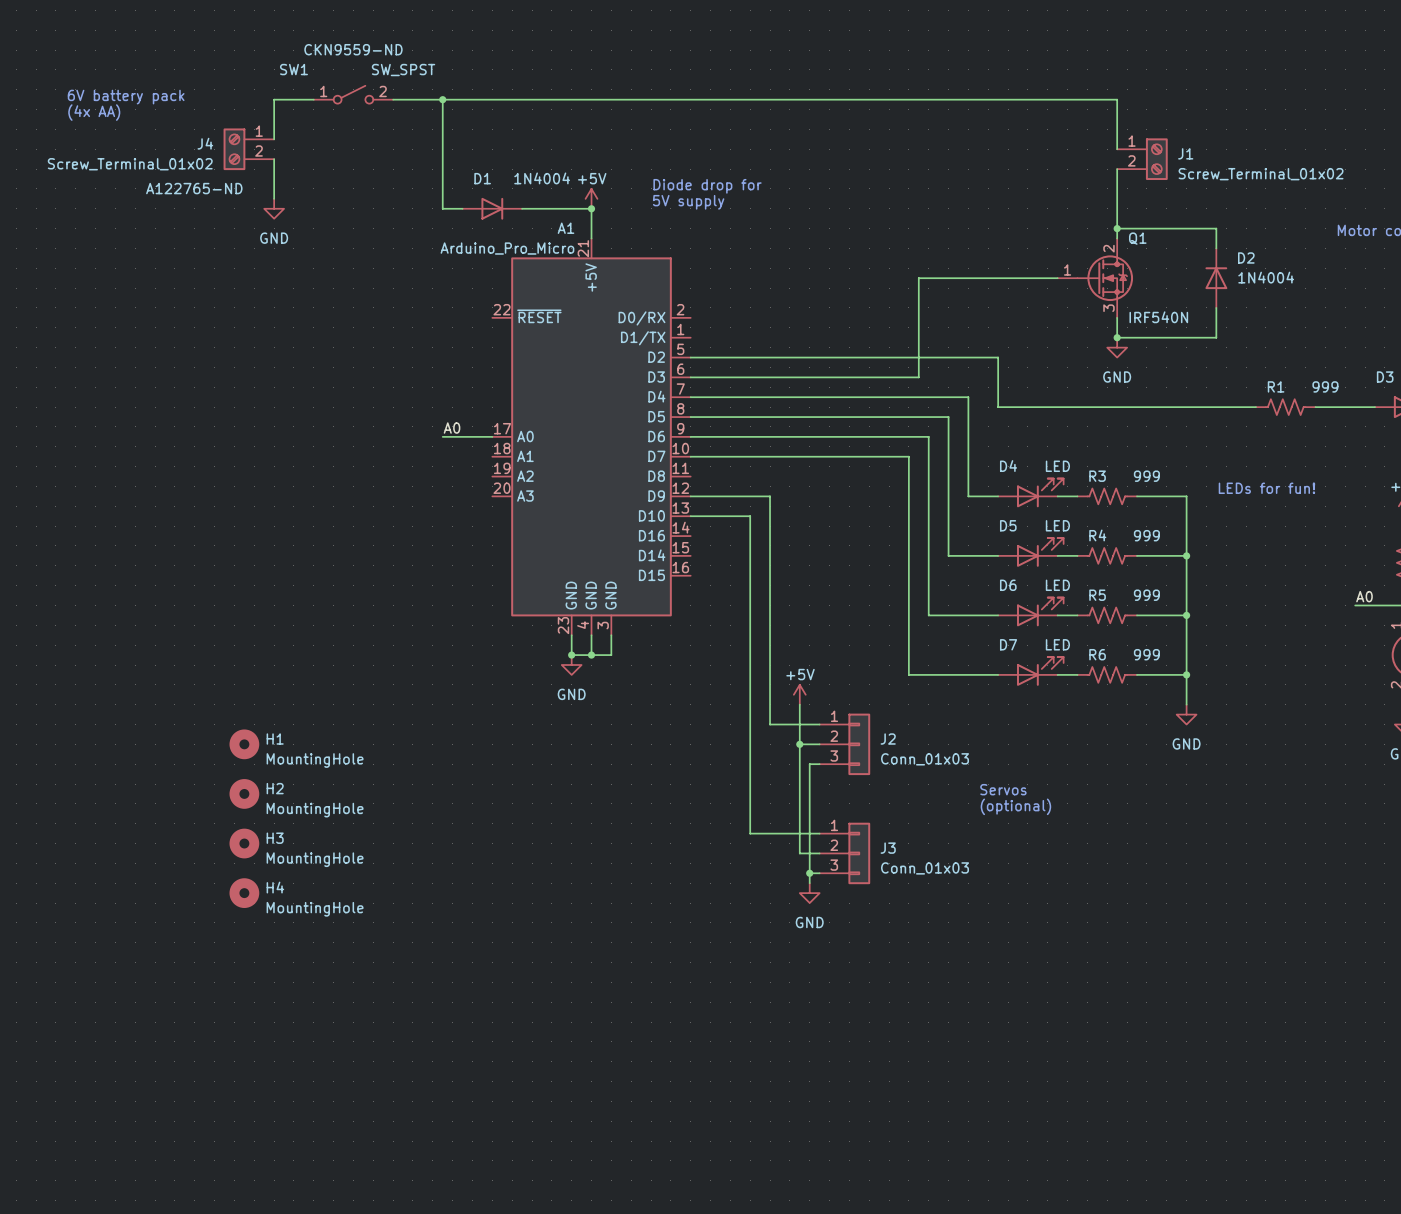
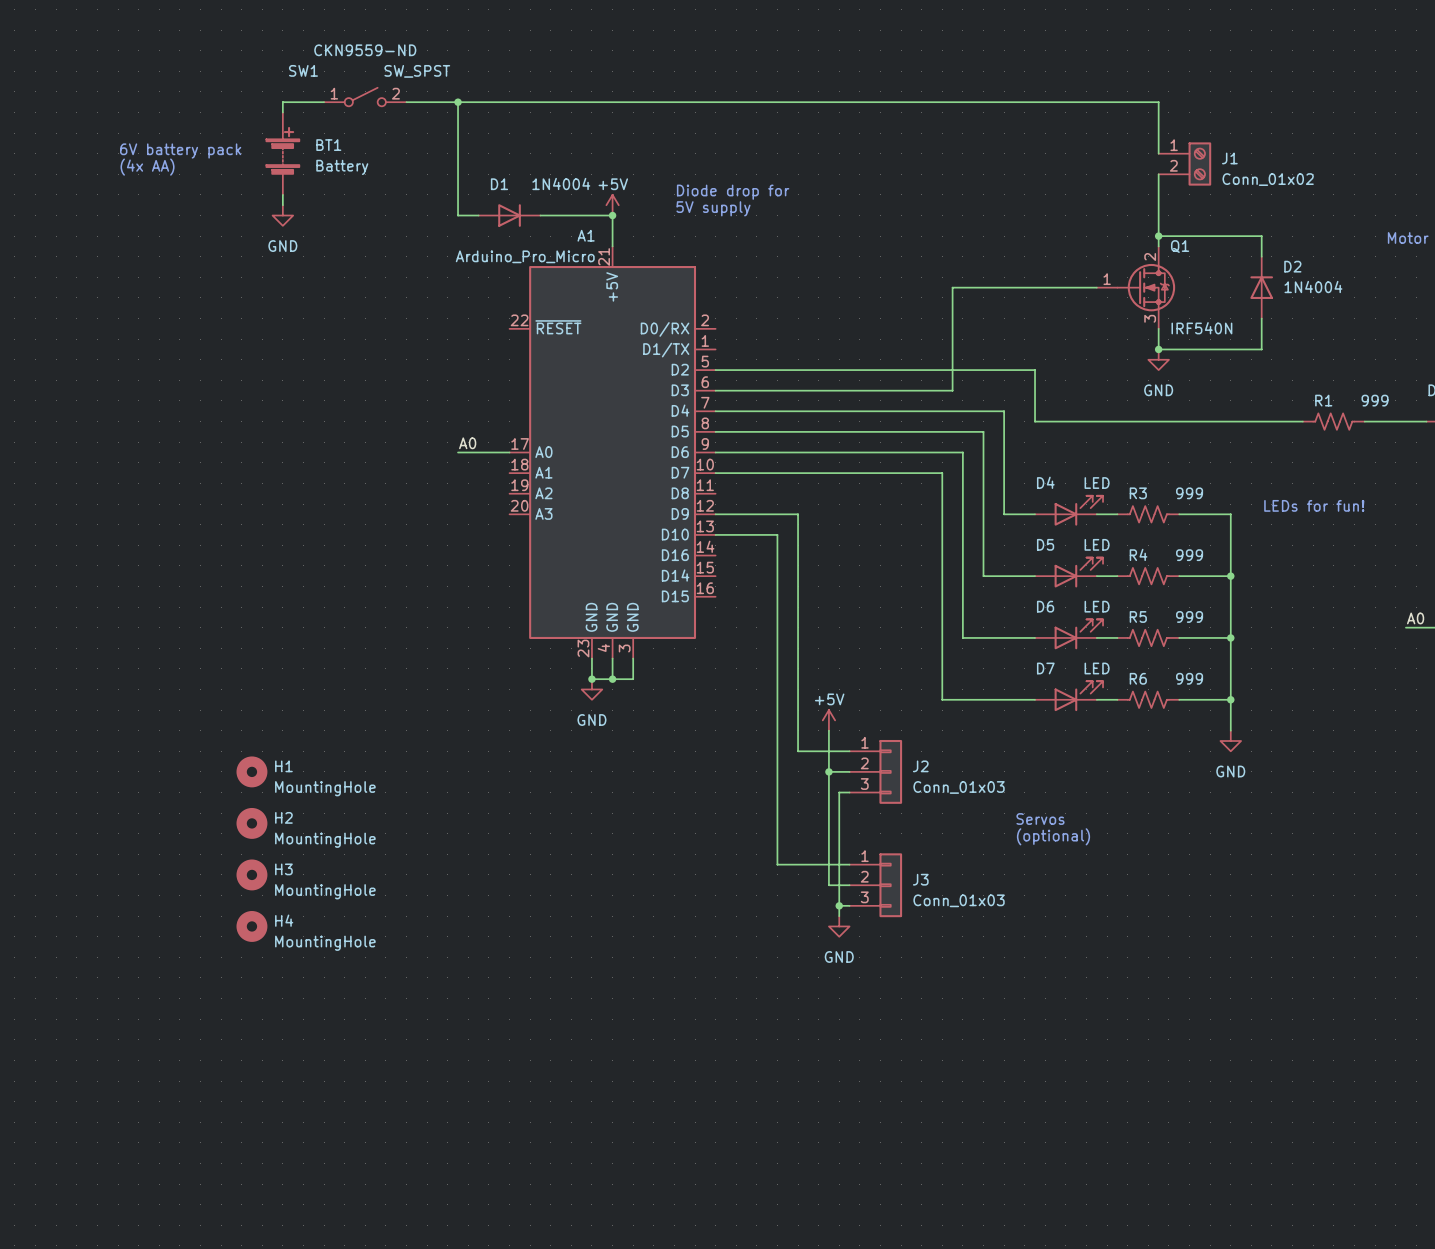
text position: 6V battery pack (126, 97) -> 6V battery pack (180, 150)
text position: (4x AA) (94, 112) -> (4x AA) (147, 167)
J4: Screw_Terminal_01x02 (248, 149) -> none
BT1: none -> Battery (282, 153)
J1 value: Screw_Terminal_01x02 (1261, 174) -> Conn_01x02 (1268, 179)

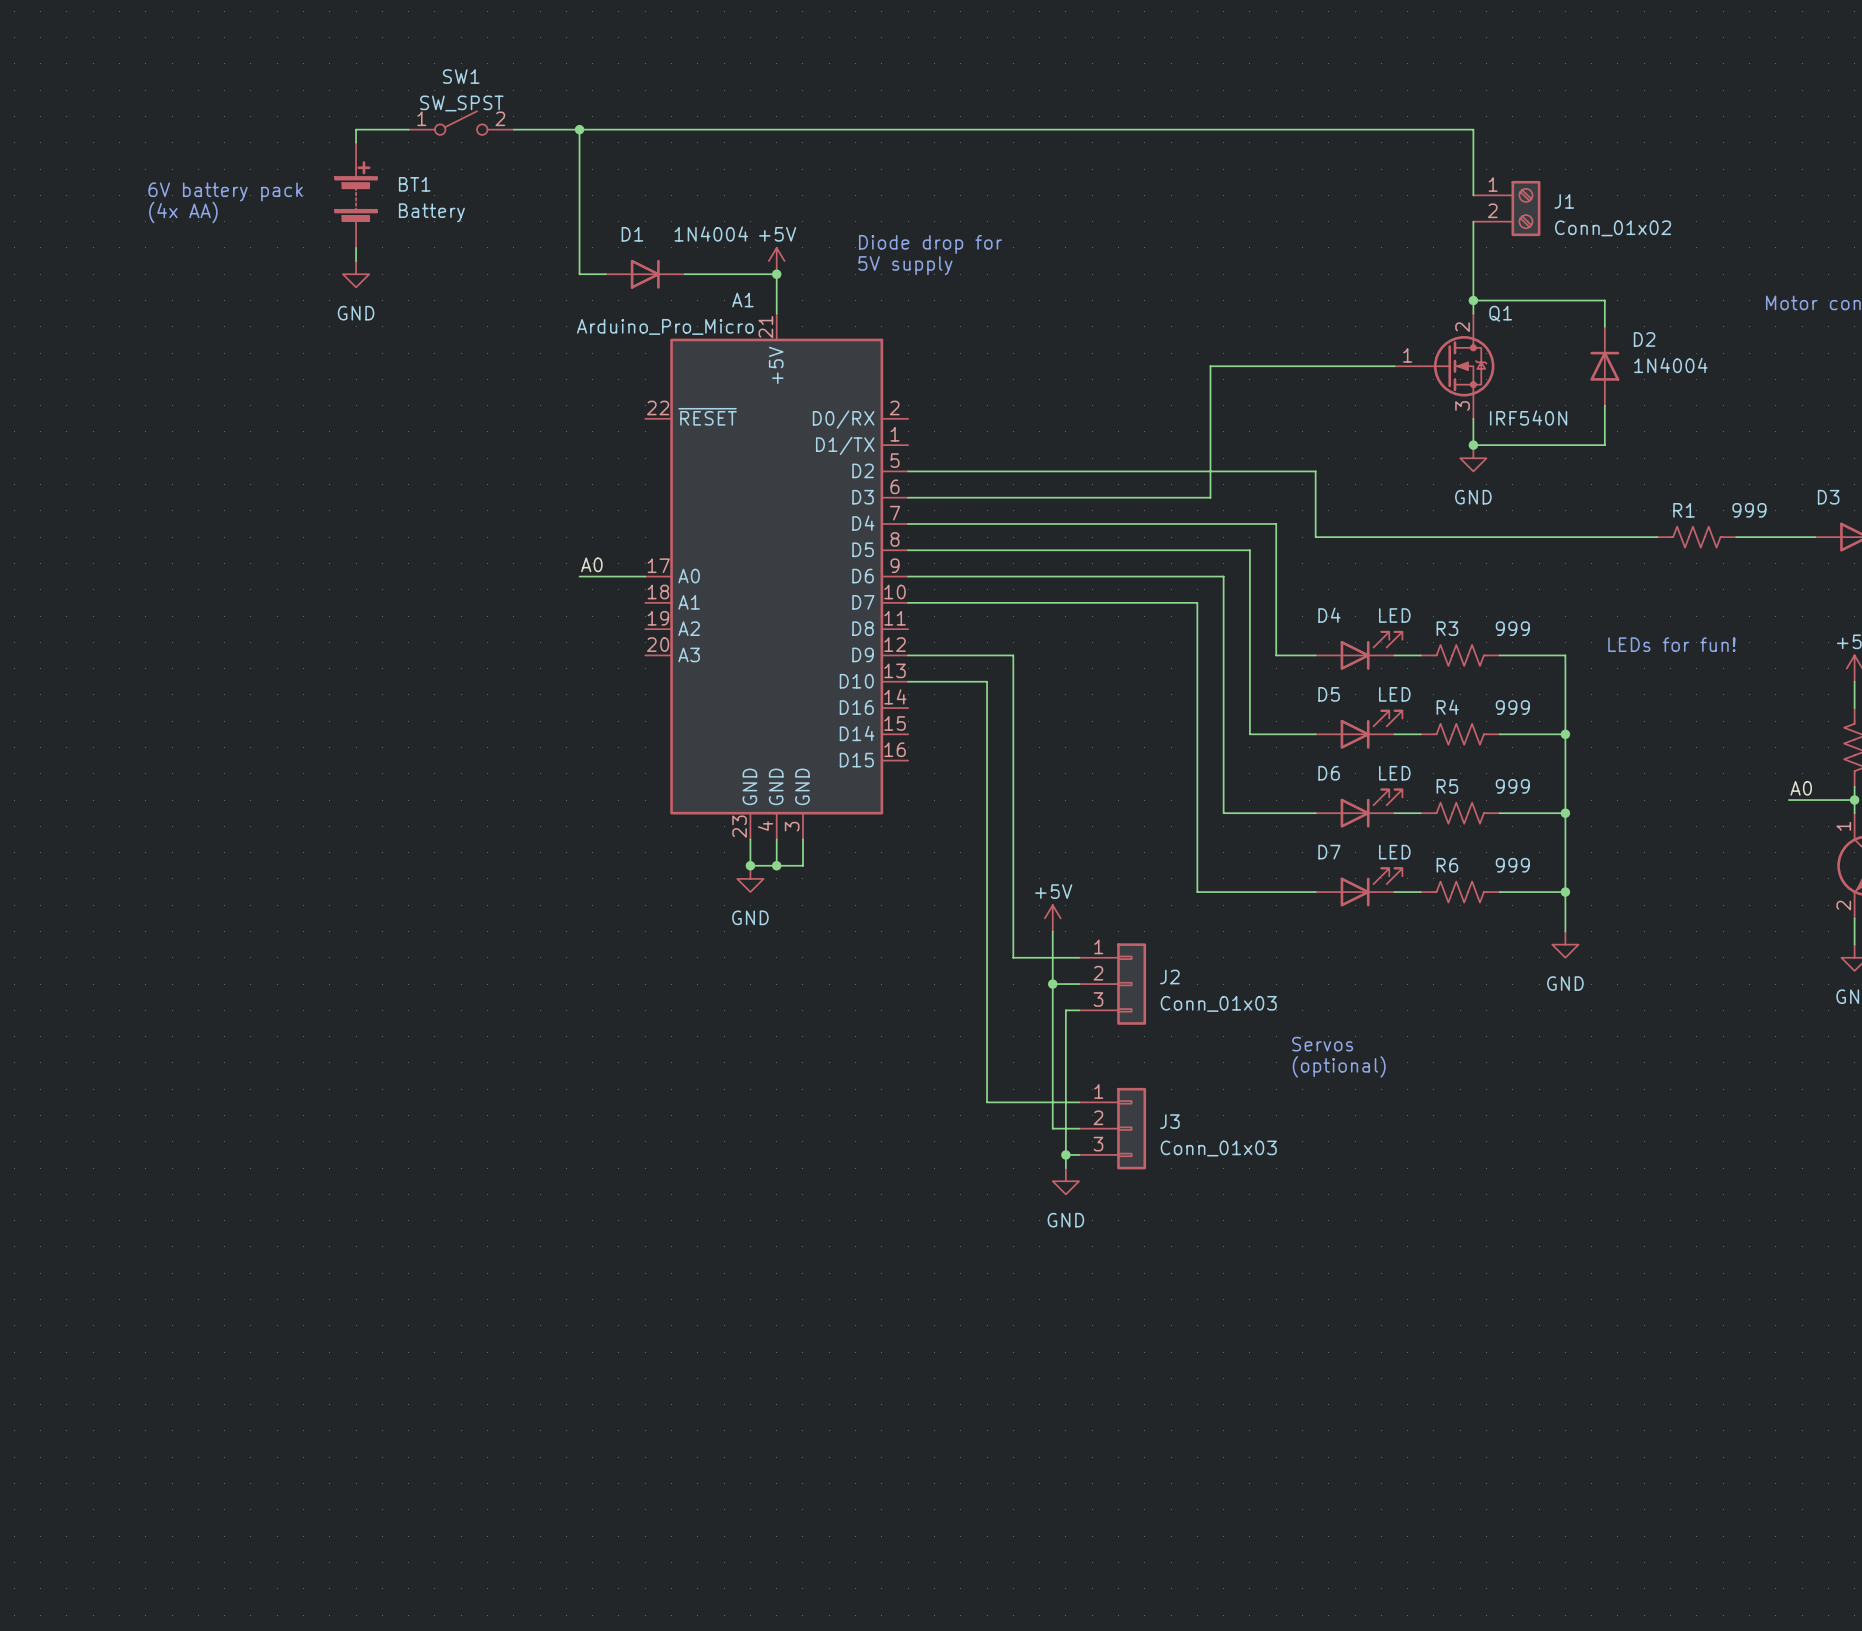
SW1 text: CKN9559-ND (365, 50) -> none
SW1 name position: SW1 (303, 70) -> SW1 (461, 76)
SW1 value position: SW_SPST (417, 71) -> SW_SPST (461, 103)
H1: MountingHole (251, 771) -> none
H2: MountingHole (251, 823) -> none
H3: MountingHole (251, 874) -> none
H4: MountingHole (251, 926) -> none

